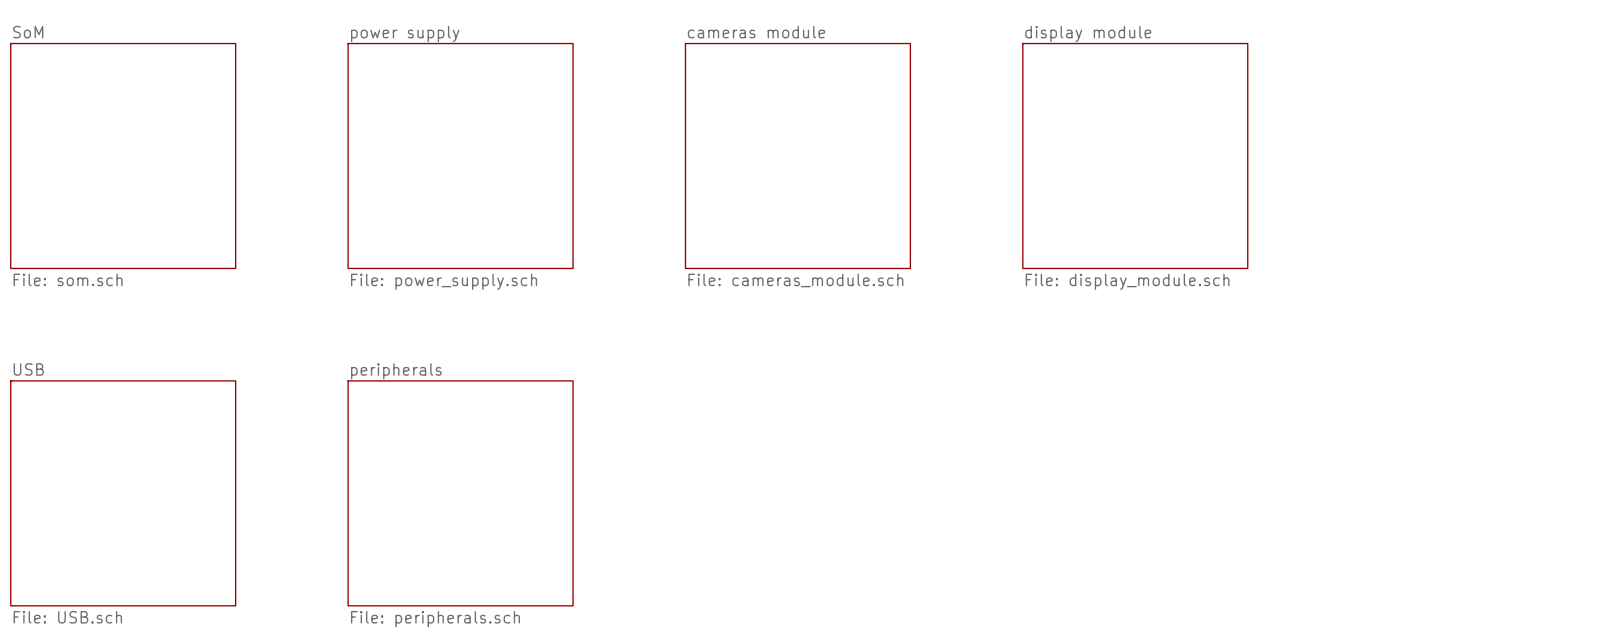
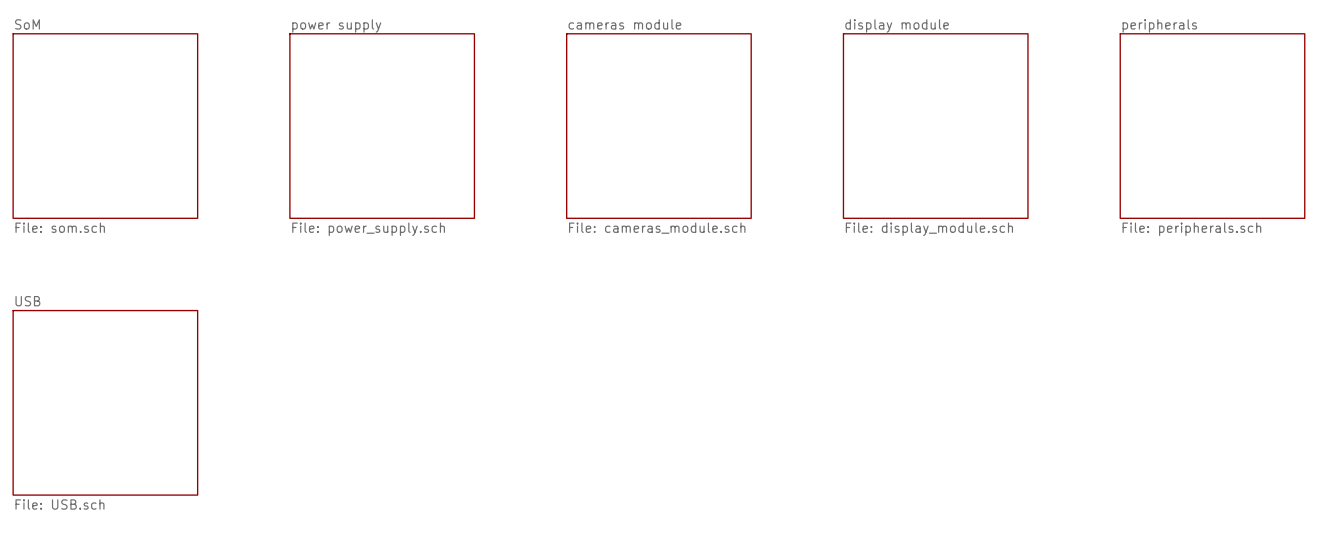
sheet peripherals: none -> File: peripherals.sch (1212, 126)
sheet peripherals: File: peripherals.sch (460, 493) -> none

